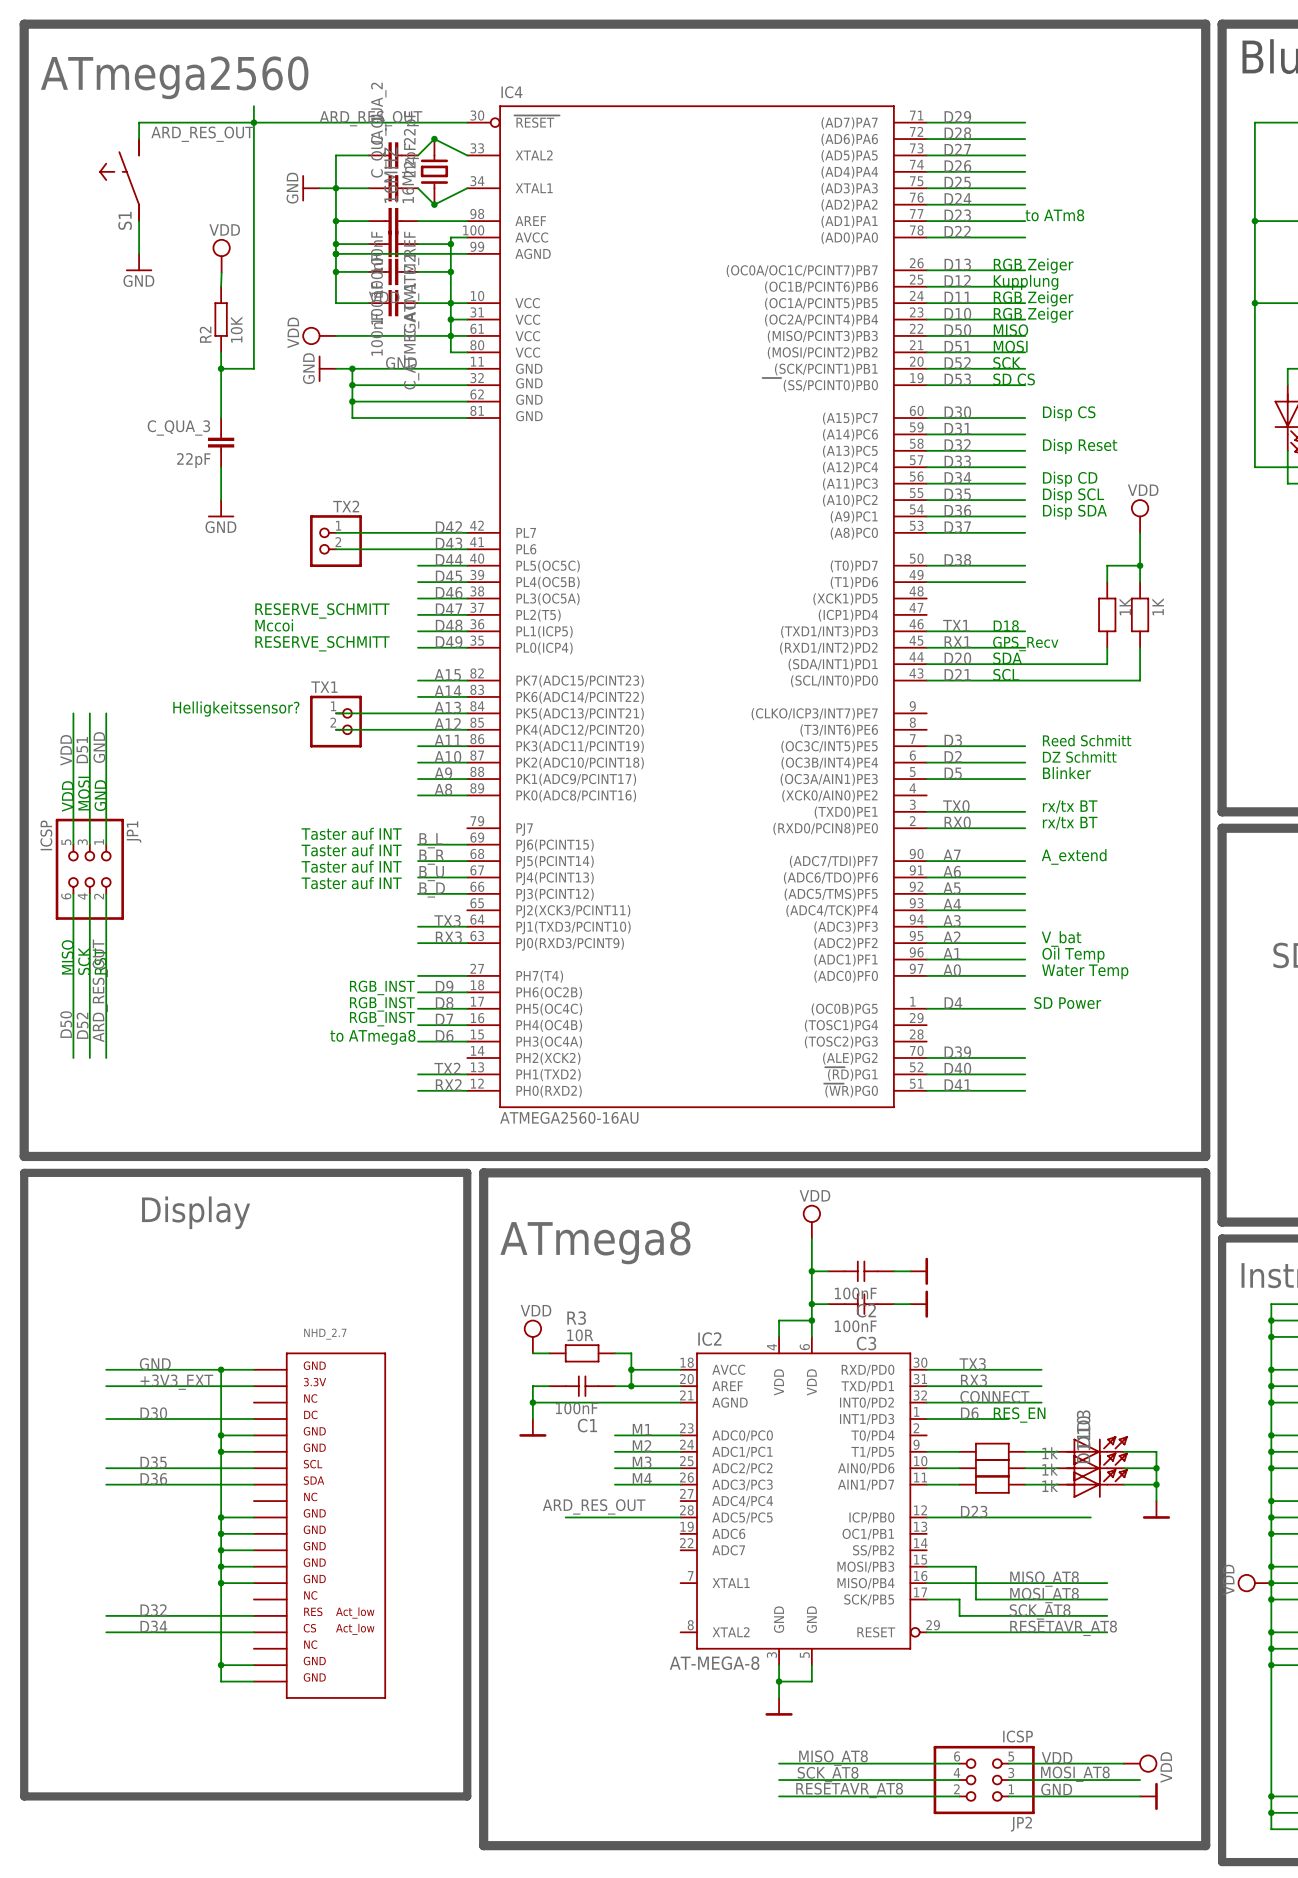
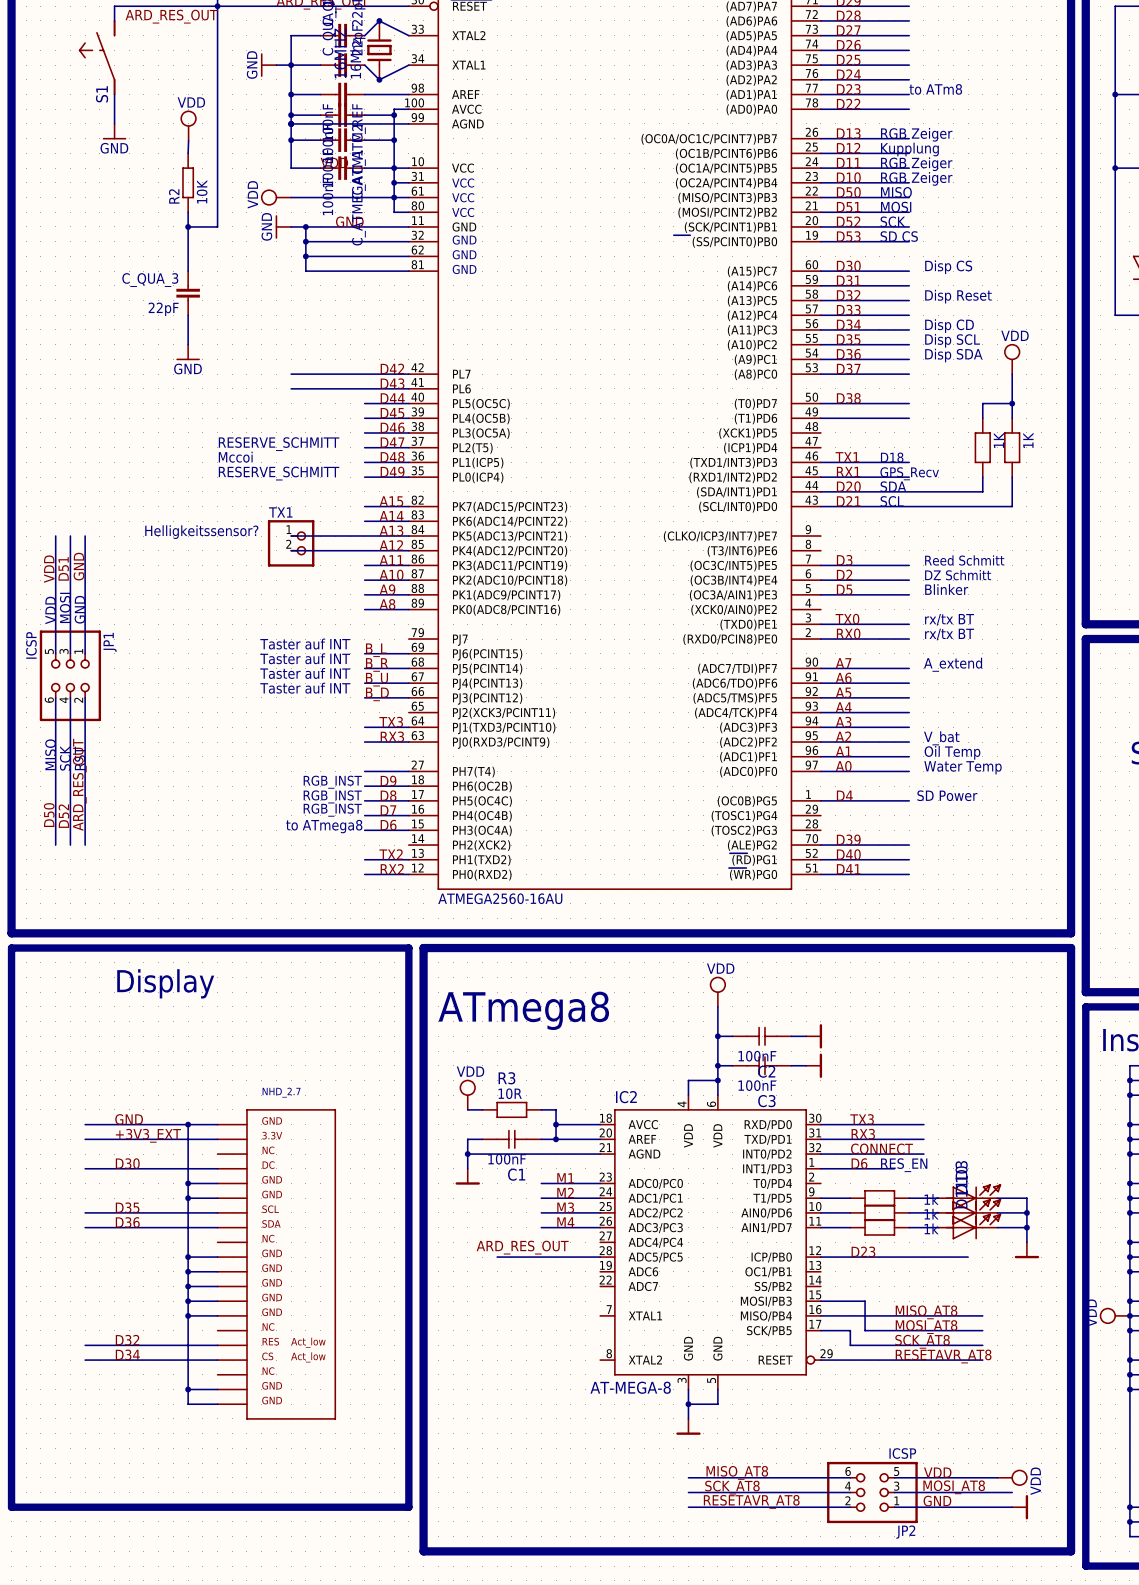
TX2: (335, 541) -> none

